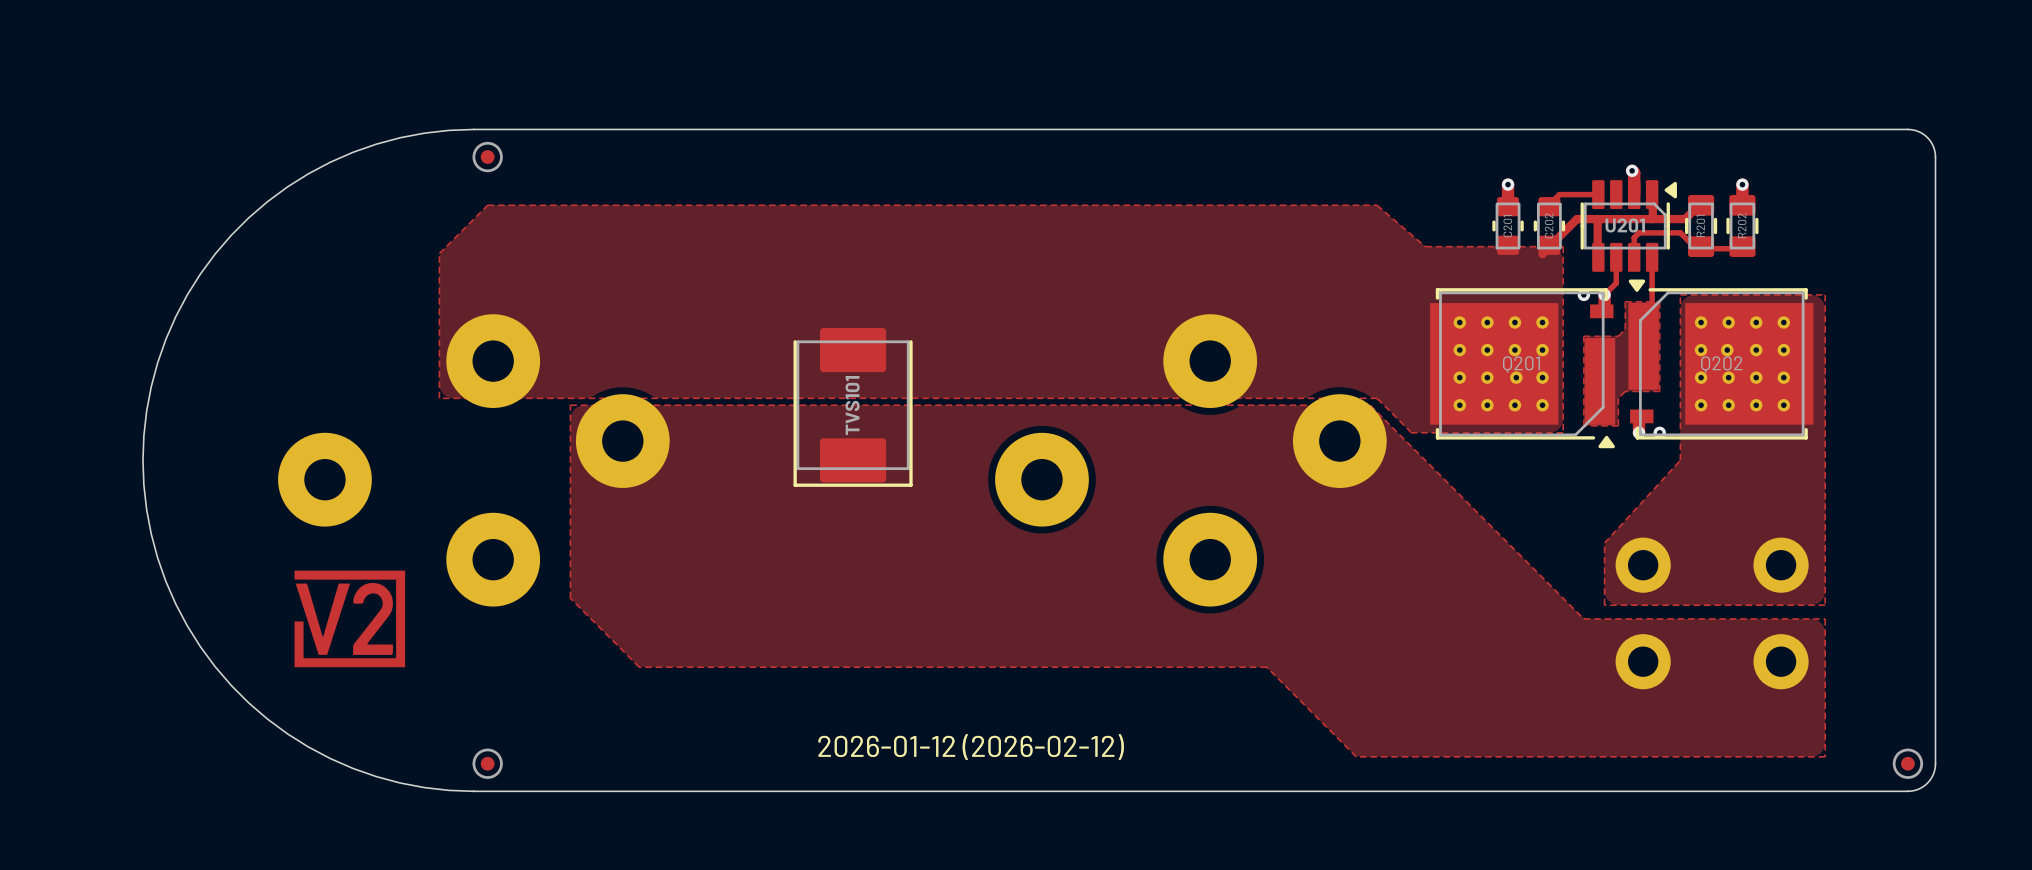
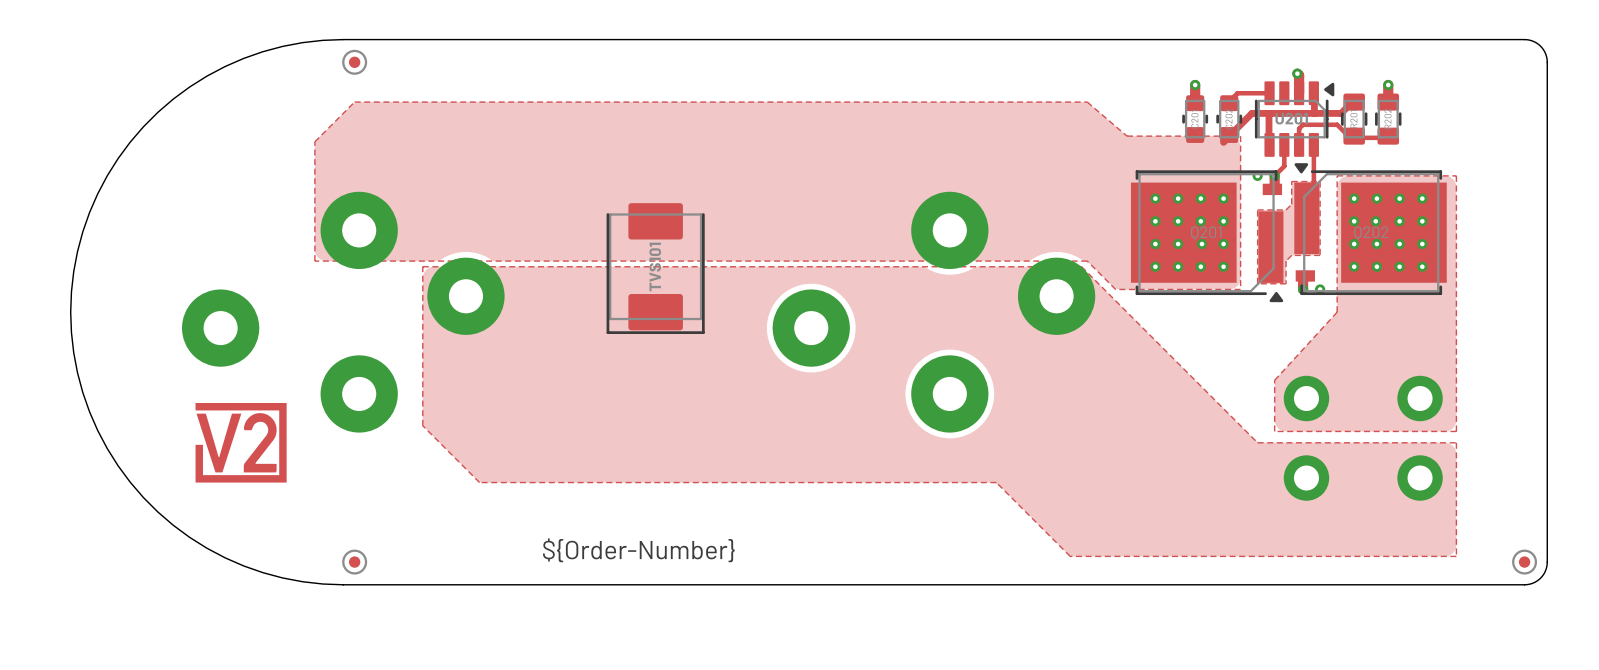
drawing: none -> [543, 538, 735, 563]
drawing: [818, 734, 1124, 760] -> none

